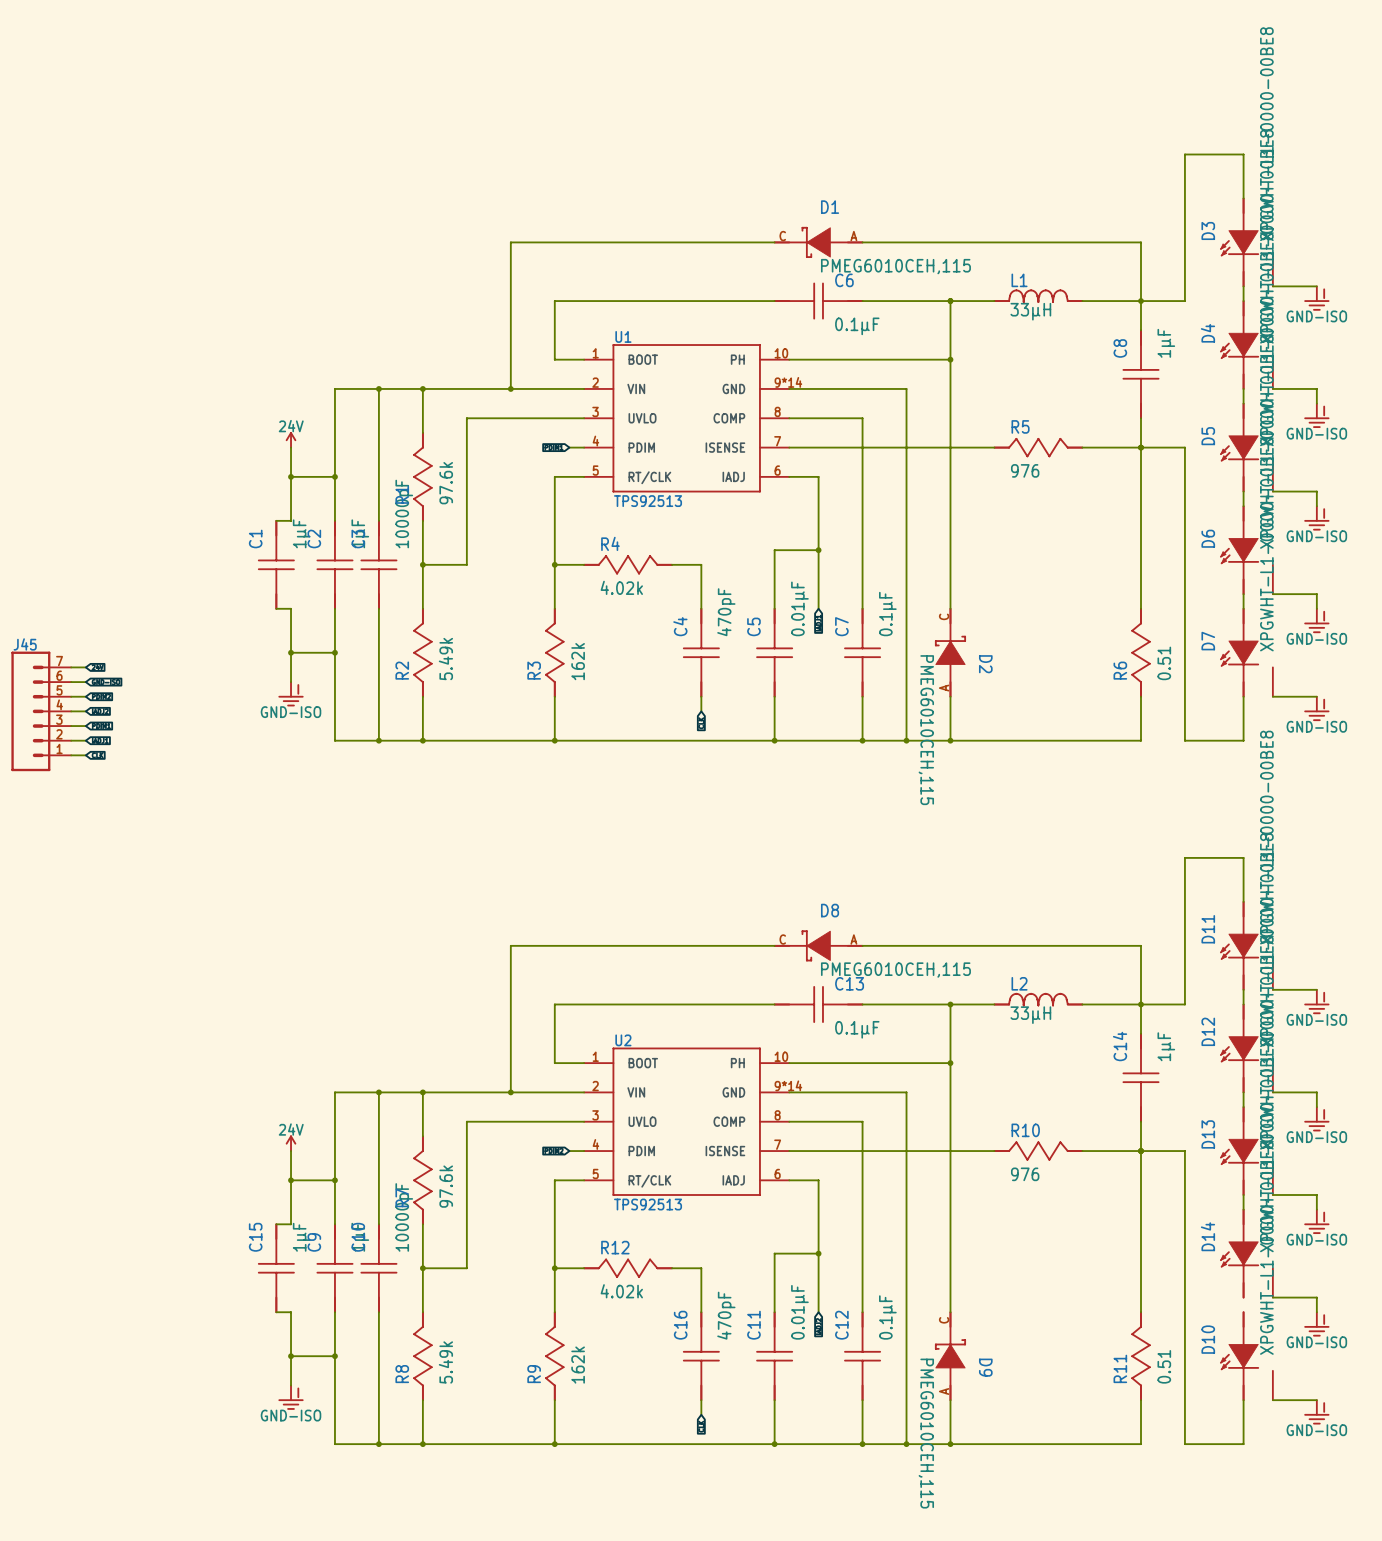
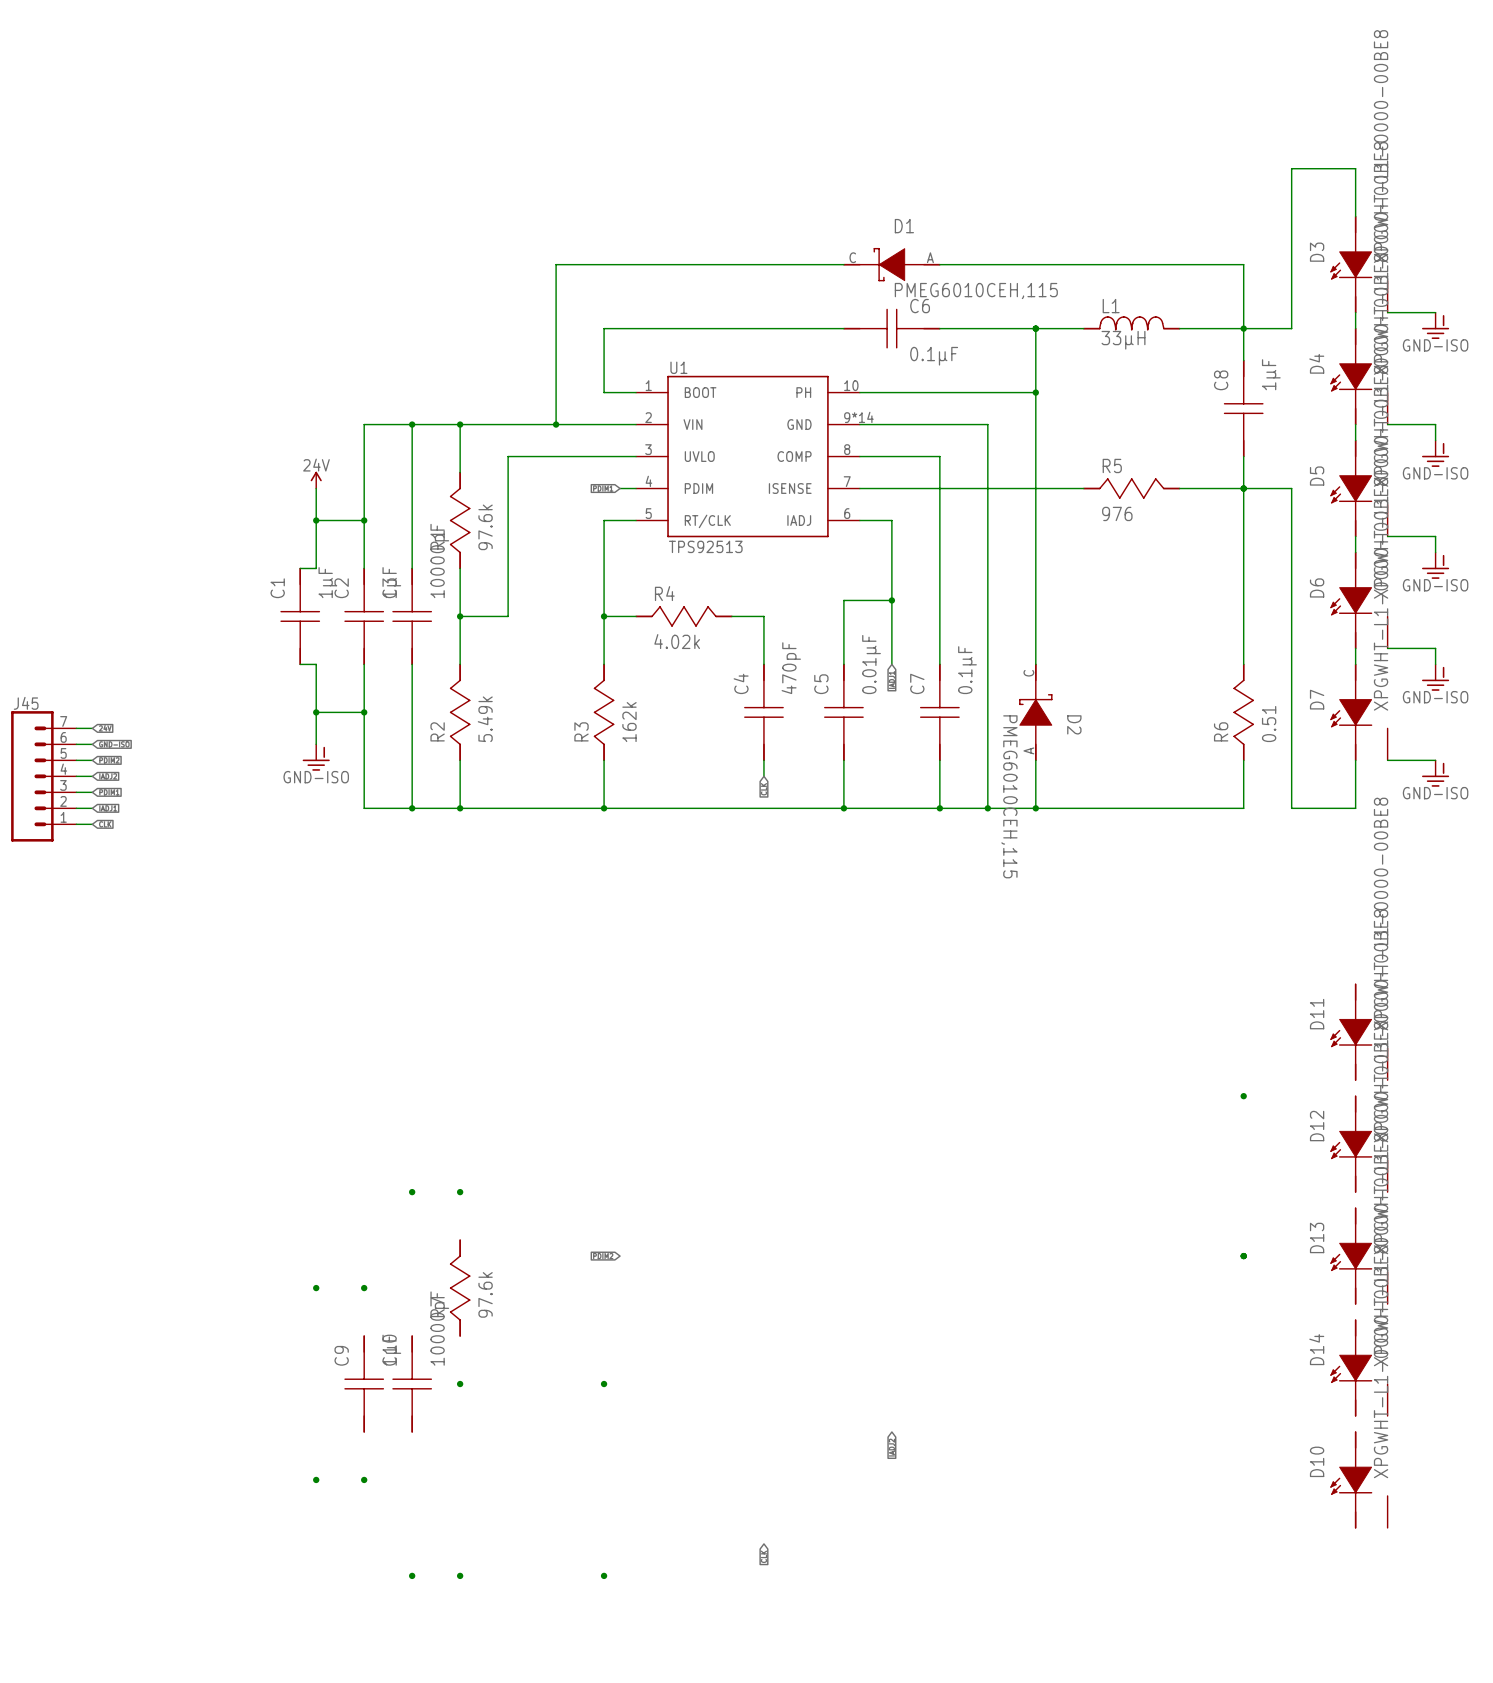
wire: (1243, 901) (1243, 857) (1184, 857) (1184, 1004) (1082, 1004) -> none
wire: (774, 945) (510, 945) (510, 1092) -> none
D8: PMEG6010CEH,115 (818, 945) -> none
wire: (862, 945) (1140, 945) (1140, 1033) -> none
wire: (1243, 989) (1243, 1004) -> none
wire: (1272, 989) (1316, 989) -> none
L2: 33µH (1038, 999) -> none
power symbol: GND-ISO (1316, 1001) -> none
wire: (774, 1004) (554, 1004) (554, 1063) (584, 1063) -> none
C13: 0.1µF (818, 1004) -> none
wire: (862, 1004) (994, 1004) -> none
wire: (950, 1004) (950, 1312) -> none
junction: (950, 1004) -> none
wire: (789, 1063) (950, 1063) -> none
junction: (950, 1063) -> none
C14: 1µF (1140, 1077) -> none
wire: (378, 1092) (378, 1224) -> none
wire: (422, 1092) (422, 1136) -> none
junction: (510, 1092) -> none
wire: (584, 1092) (334, 1092) (334, 1224) -> none
wire: (789, 1092) (906, 1092) (906, 1444) -> none
wire: (1243, 1092) (1243, 1107) -> none
wire: (1272, 1092) (1316, 1092) (1316, 1107) -> none
power symbol: GND-ISO (1316, 1119) -> none
wire: (584, 1121) (466, 1121) (466, 1268) (422, 1268) -> none
U2: TPS92513 (686, 1121) -> none
wire: (789, 1121) (862, 1121) (862, 1312) -> none
wire: (1140, 1121) (1140, 1312) -> none
power symbol: 24V (291, 1143) -> none
wire: (291, 1151) (291, 1224) (276, 1224) -> none
wire: (569, 1151) (584, 1151) -> none
wire: (789, 1151) (994, 1151) -> none
R10: 976 (1038, 1151) -> none
wire: (1082, 1151) (1184, 1151) (1184, 1444) (1243, 1444) (1243, 1400) -> none
wire: (291, 1180) (334, 1180) -> none
wire: (584, 1180) (554, 1180) (554, 1312) -> none
wire: (789, 1180) (818, 1180) (818, 1312) -> none
wire: (1243, 1194) (1243, 1209) -> none
wire: (1272, 1194) (1316, 1194) (1316, 1209) -> none
power symbol: GND-ISO (1316, 1221) -> none
wire: (422, 1224) (422, 1312) -> none
wire: (818, 1253) (774, 1253) (774, 1312) -> none
junction: (818, 1253) -> none
C15: 1µF (276, 1268) -> none
wire: (554, 1268) (584, 1268) -> none
R12: 4.02k (628, 1268) -> none
wire: (672, 1268) (701, 1268) (701, 1312) -> none
wire: (1272, 1297) (1316, 1297) (1316, 1312) -> none
wire: (276, 1312) (291, 1312) (291, 1385) -> none
wire: (334, 1312) (334, 1444) (1140, 1444) (1140, 1400) -> none
wire: (378, 1312) (378, 1444) -> none
power symbol: GND-ISO (1316, 1324) -> none
wire: (291, 1356) (334, 1356) -> none
R8: 5.49k (422, 1356) -> none
R9: 162k (554, 1356) -> none
C16: 470pF (701, 1356) -> none
C11: 0.01μF (774, 1356) -> none
C12: 0.1µF (862, 1356) -> none
D9: PMEG6010CEH,115 (950, 1356) -> none
R11: 0.51 (1140, 1356) -> none
power symbol: GND-ISO (291, 1397) -> none
wire: (422, 1400) (422, 1444) -> none
wire: (554, 1400) (554, 1444) -> none
wire: (701, 1400) (701, 1414) -> none
wire: (774, 1400) (774, 1444) -> none
wire: (862, 1400) (862, 1444) -> none
wire: (950, 1400) (950, 1444) -> none
wire: (1272, 1400) (1316, 1400) -> none
power symbol: GND-ISO (1316, 1412) -> none
junction: (774, 1444) -> none
junction: (862, 1444) -> none
junction: (906, 1444) -> none
junction: (950, 1444) -> none

